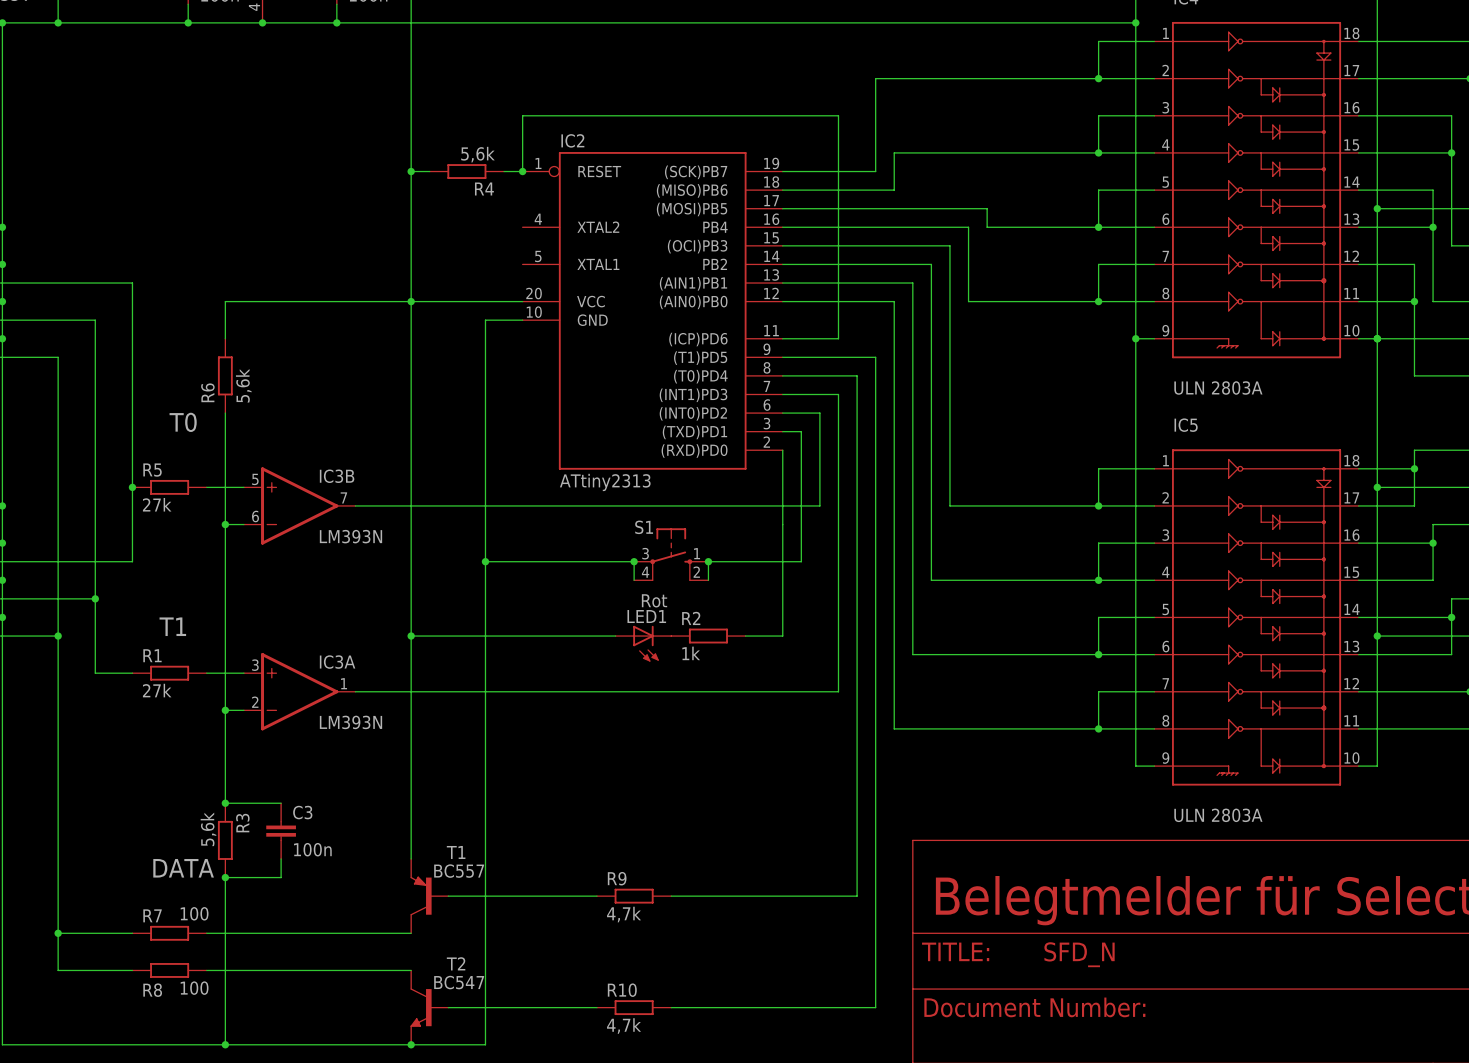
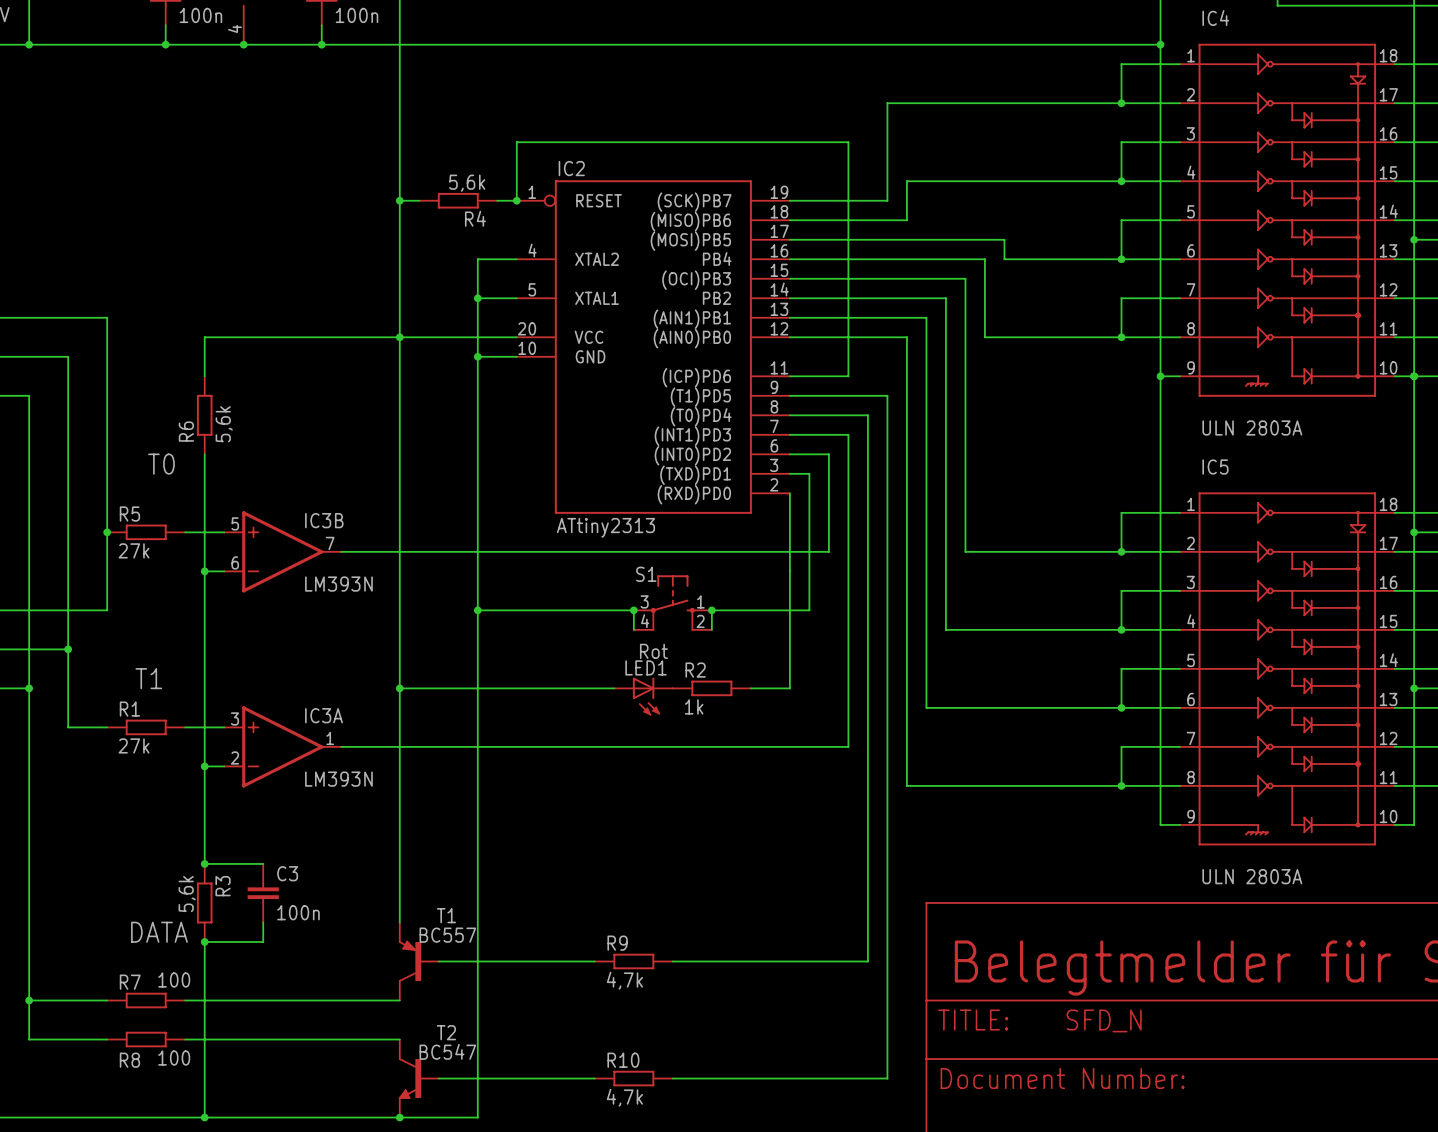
wire: none -> (516, 259) (477, 259) (477, 356)
wire: none -> (477, 298) (516, 298)
junction: none -> (477, 298)
junction: none -> (477, 356)

